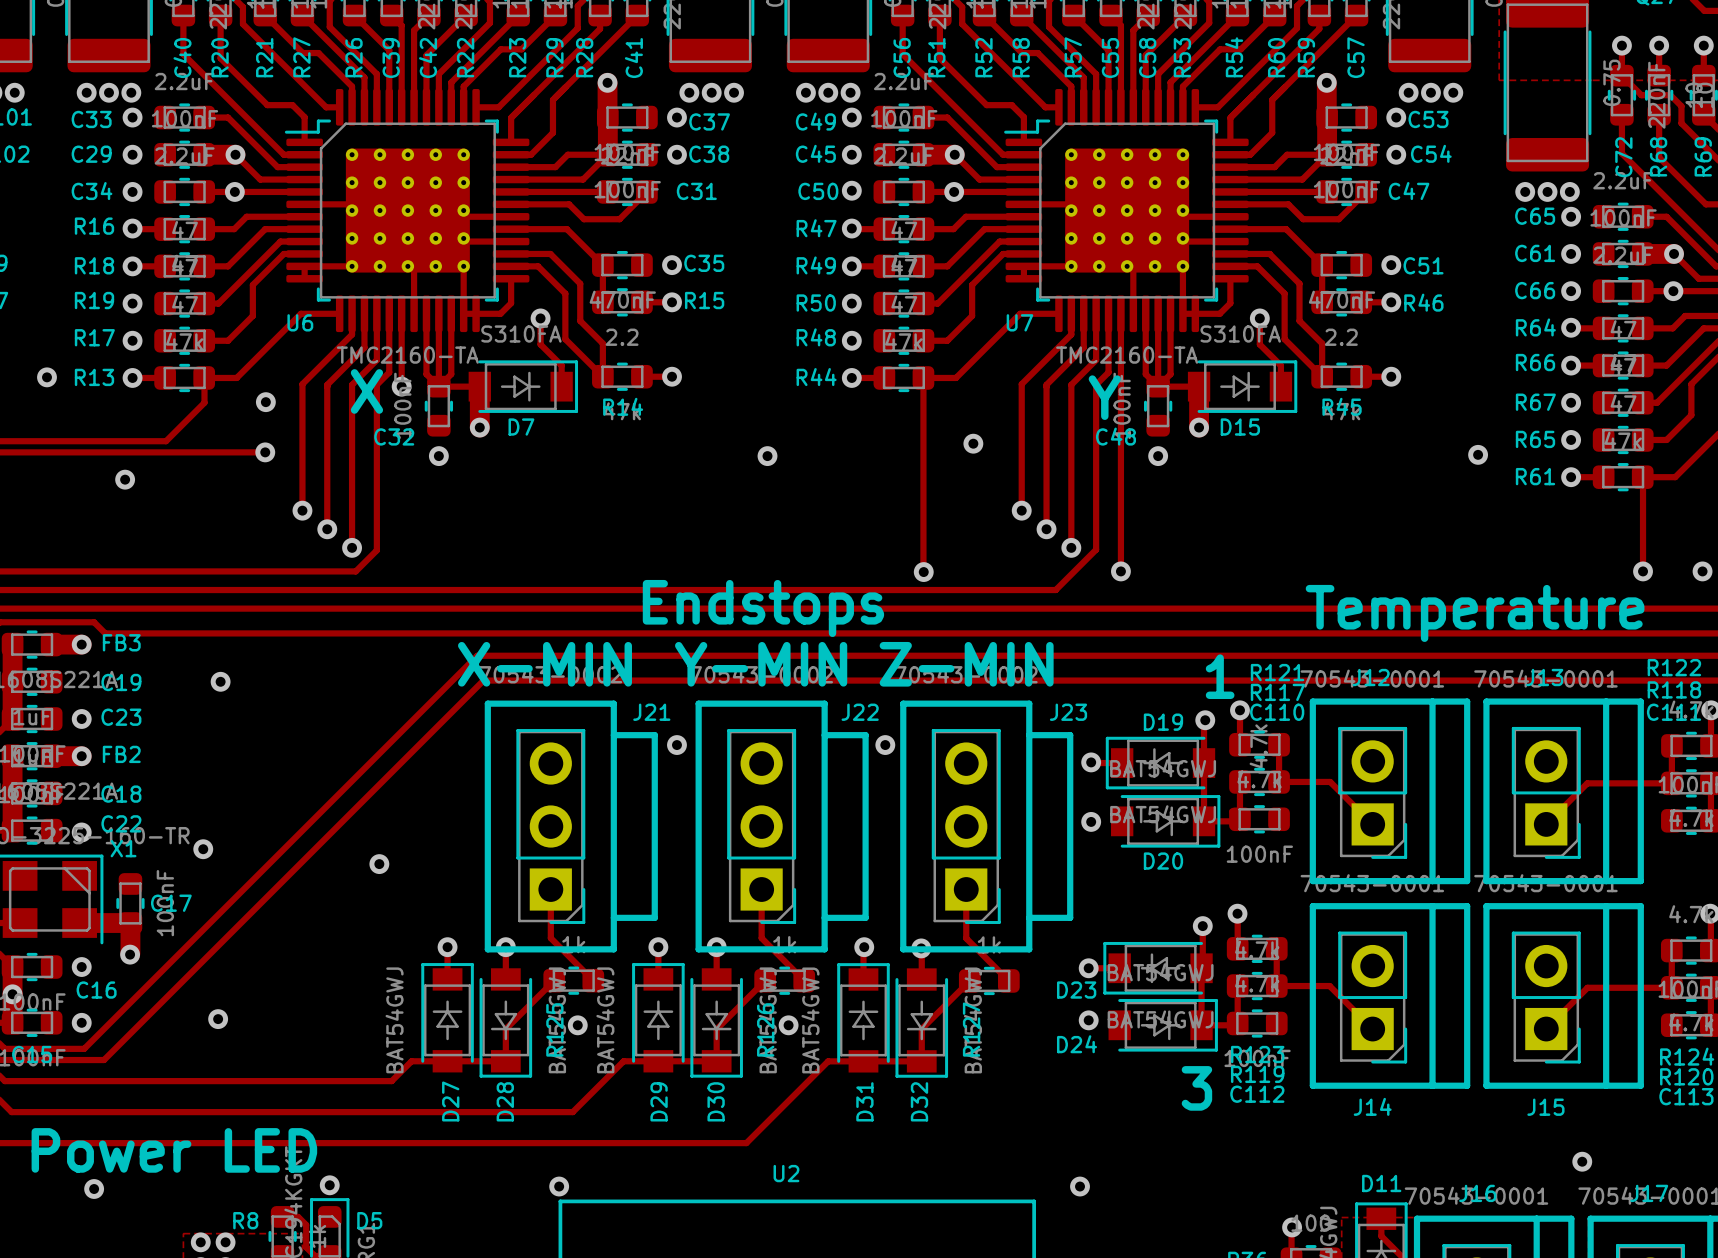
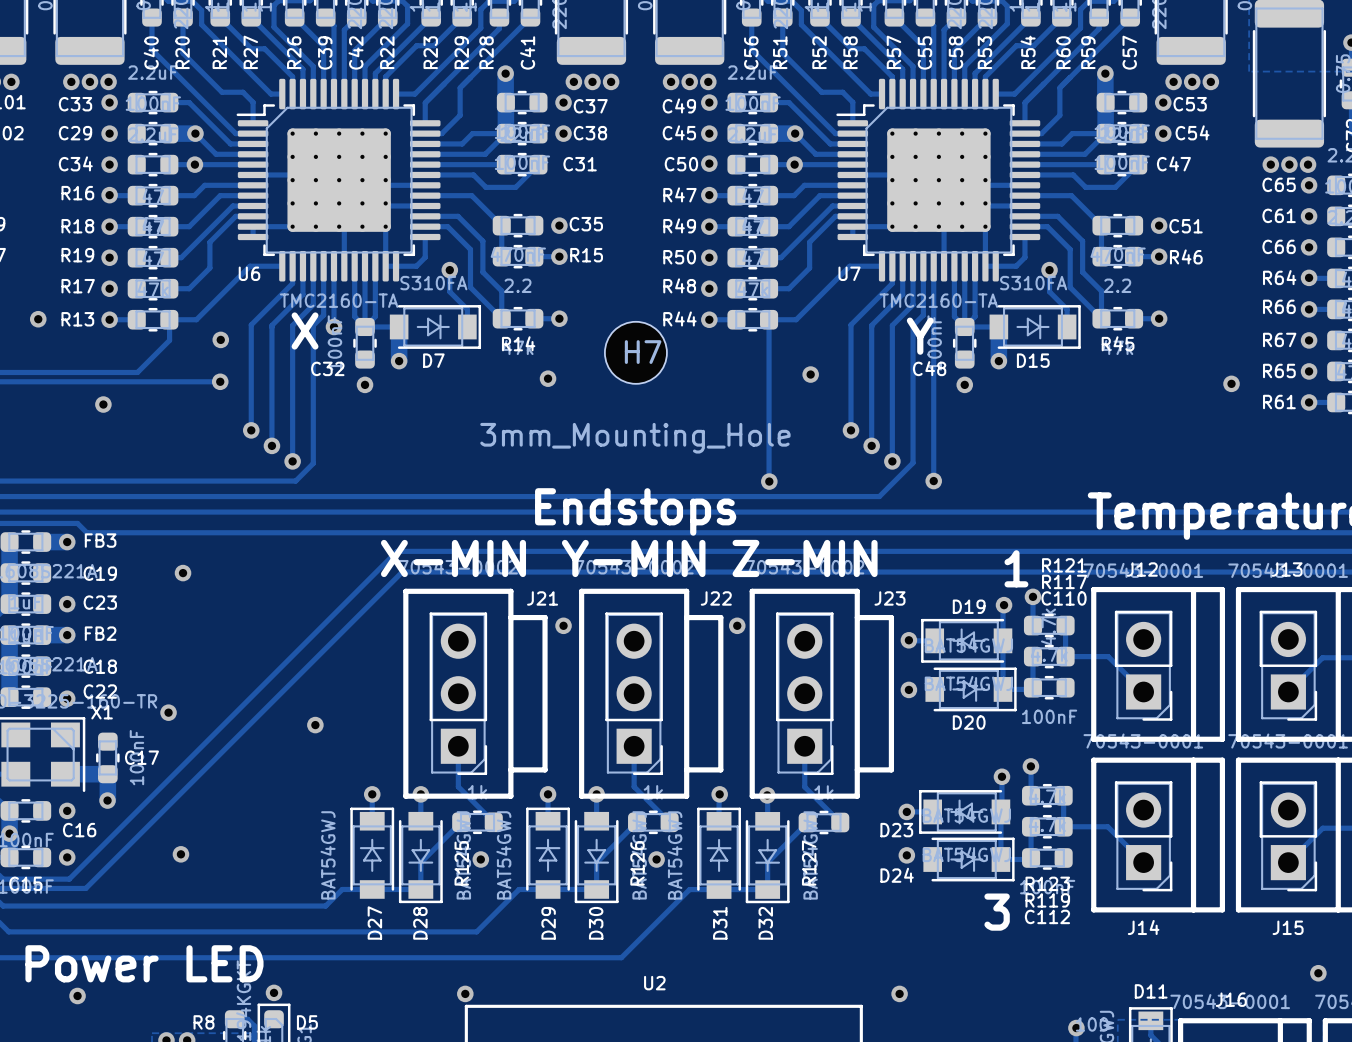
H7: none -> 3mm_Mounting_Hole (635, 352)
via position: (767, 456) -> (548, 378)

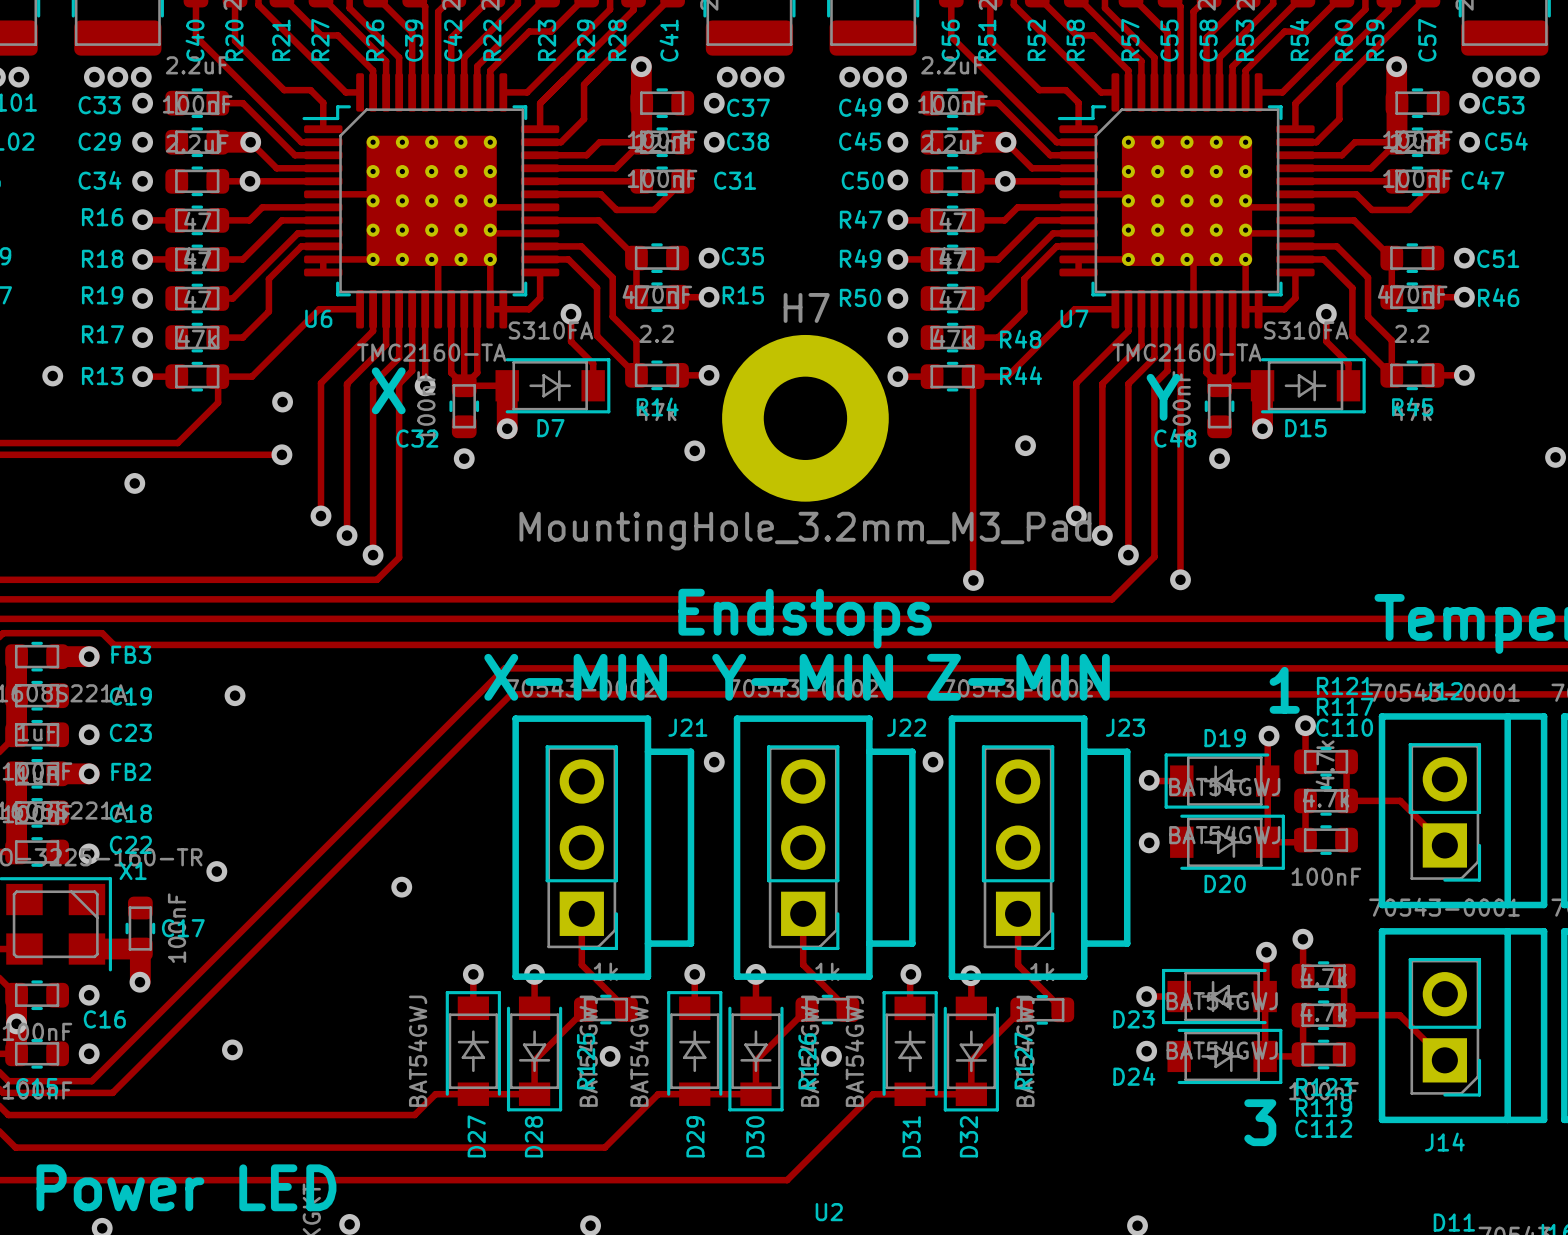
R48 name position: R48 (679, 285) -> R48 (1020, 339)
R44 name position: R44 (679, 318) -> R44 (1021, 375)
H7 footprint: [604, 321, 667, 384] -> [722, 334, 889, 502]
H7 name position: H7 (643, 352) -> H7 (806, 307)
H7 value: 3mm_Mounting_Hole (635, 438) -> MountingHole_3.2mm_M3_Pad (805, 531)

